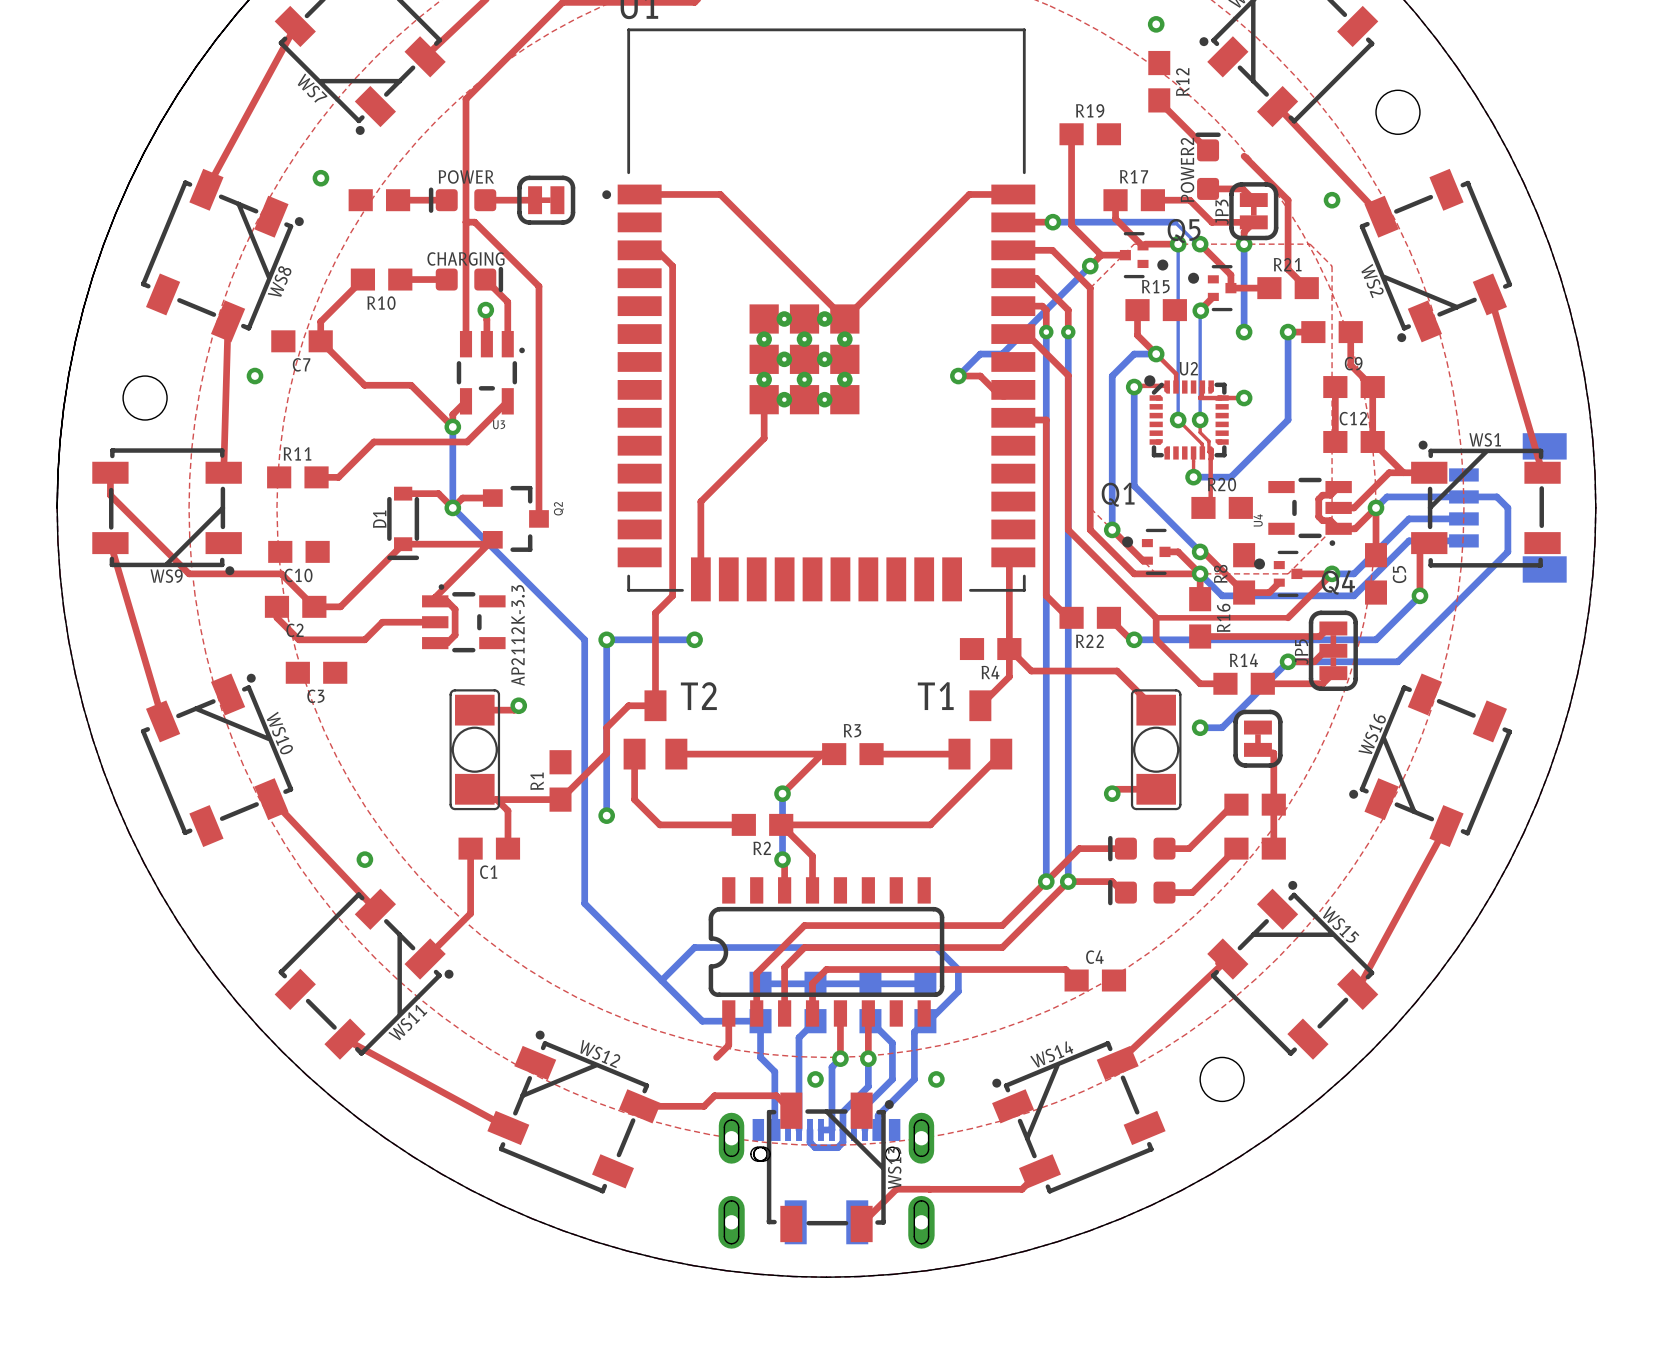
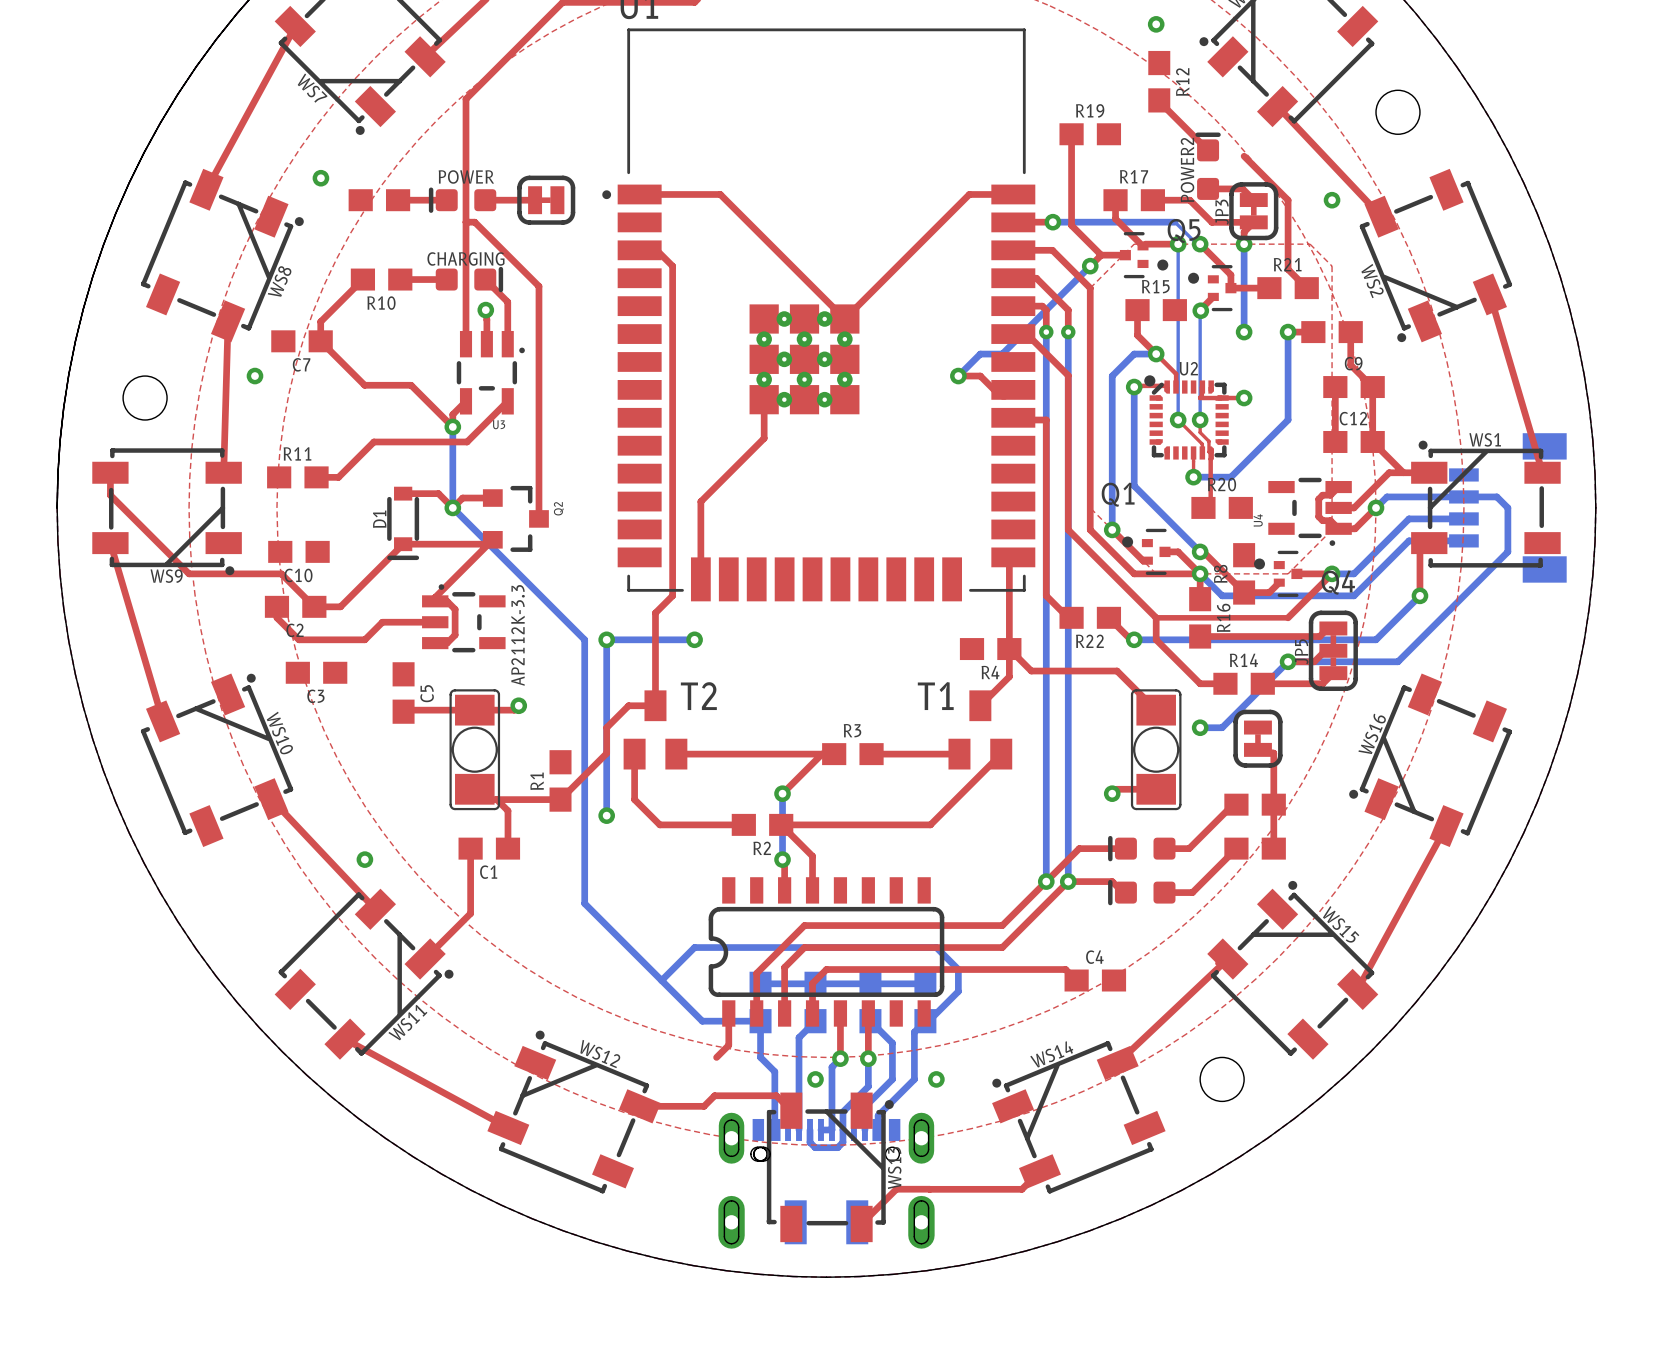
top track: (1376, 507) (1376, 555) -> none
C5 position: (1376, 573) -> (403, 693)
top track: none -> (474, 710) (405, 710) (403, 711)

